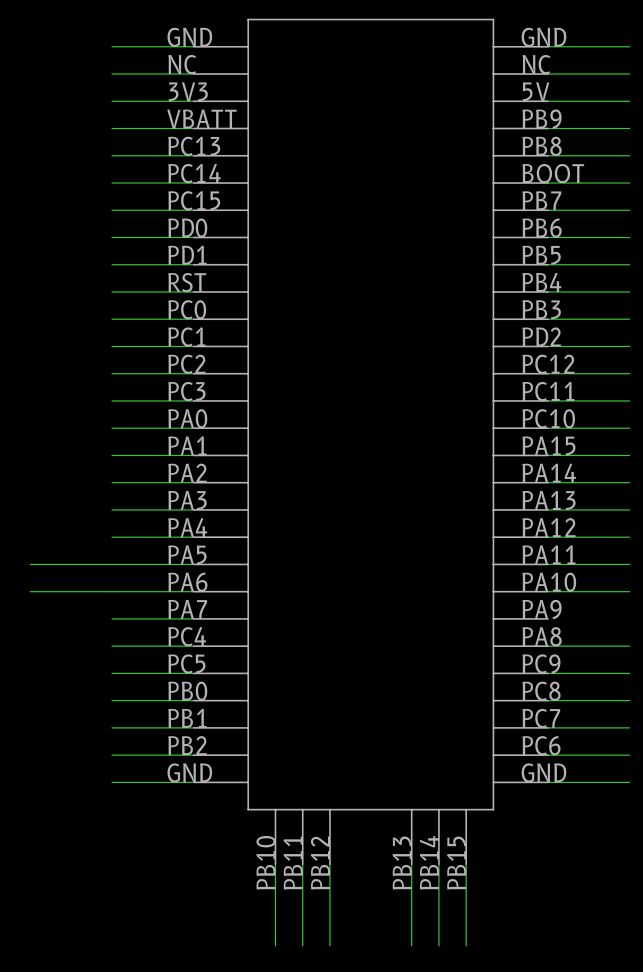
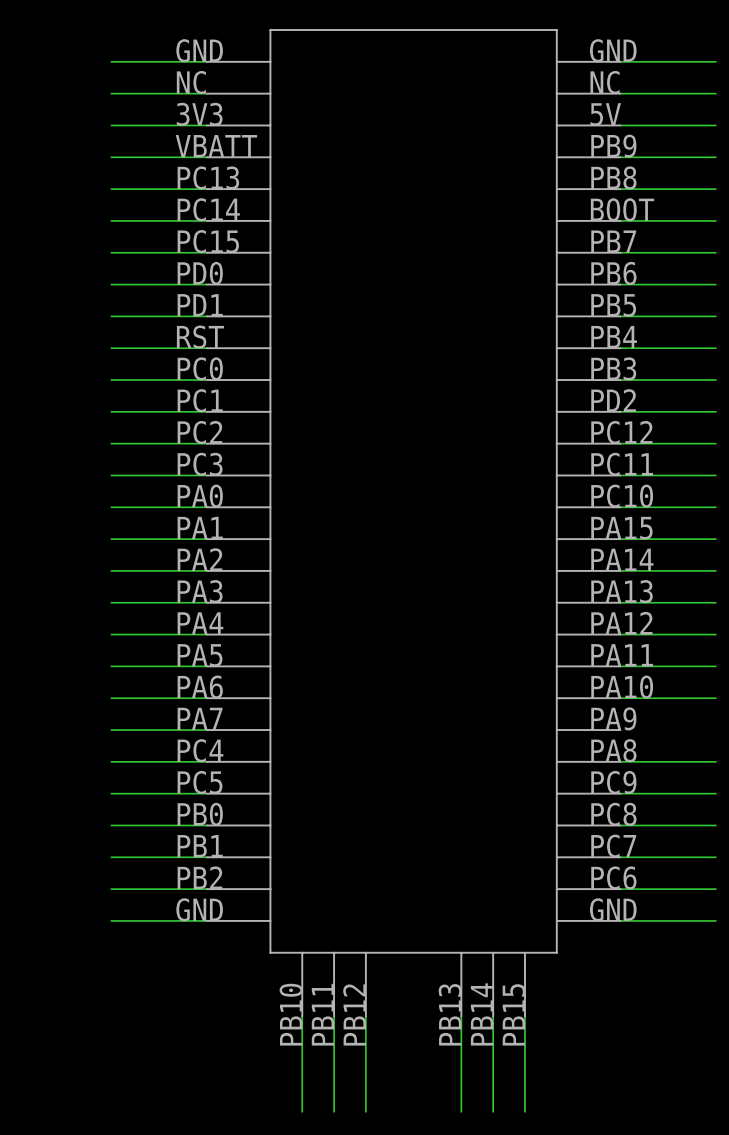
wire: (30, 564) (112, 564) -> none
wire: (30, 591) (112, 591) -> none

